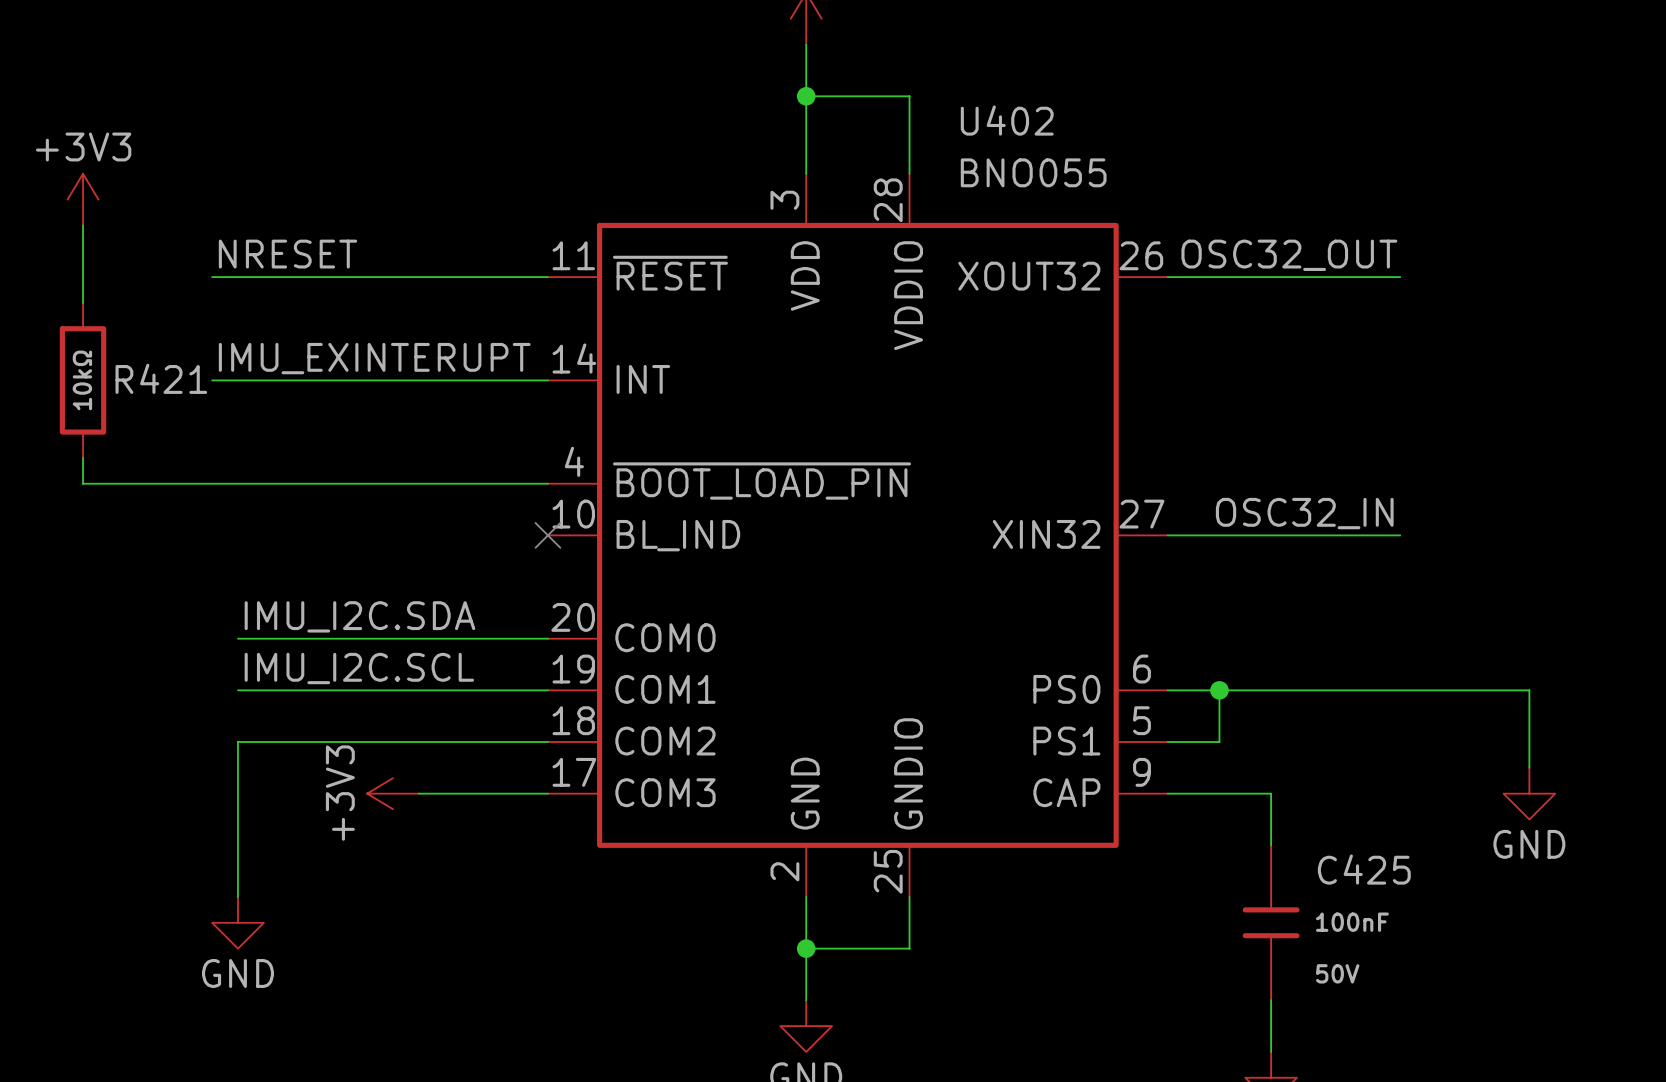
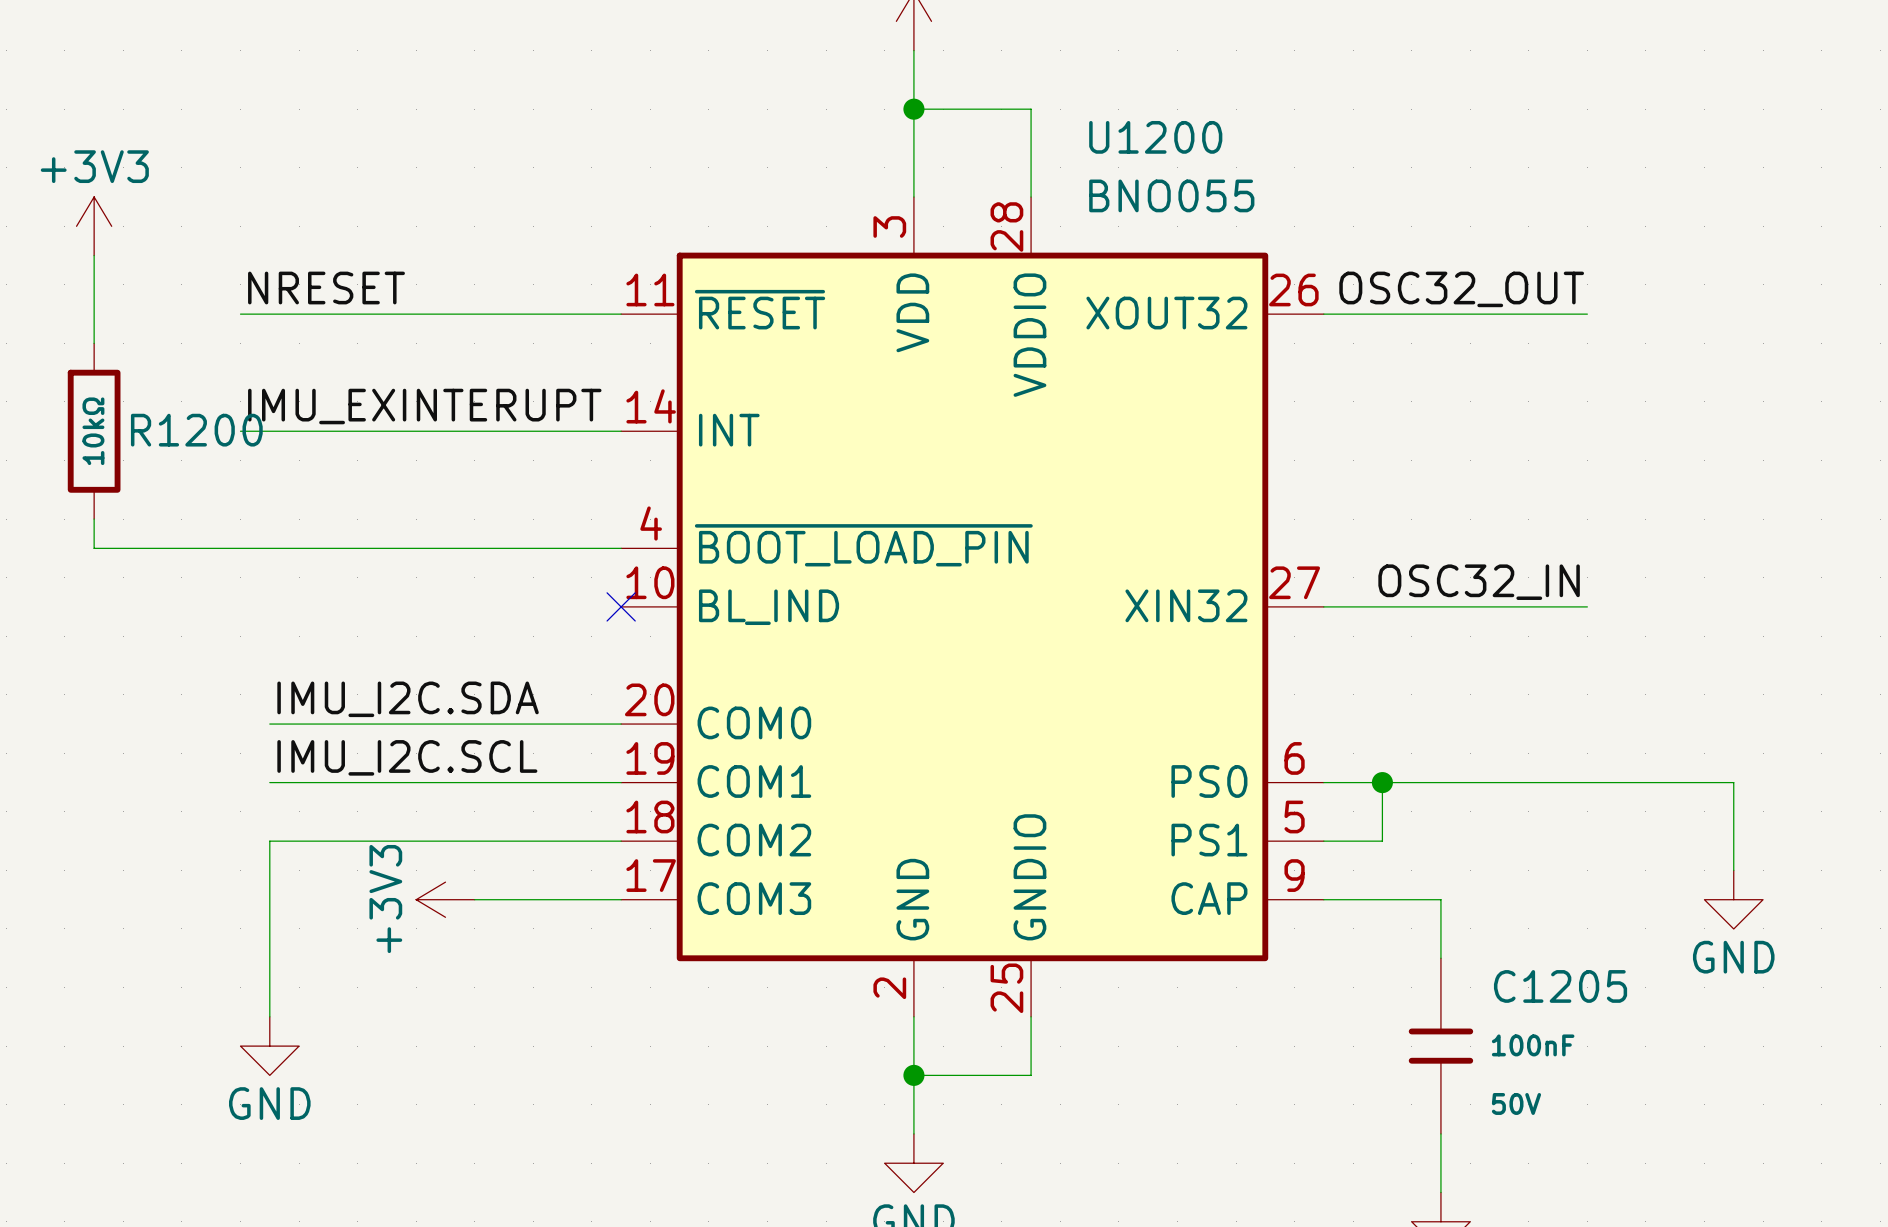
U402 name: U402 (1007, 120) -> U1200 (1155, 137)
R421 name: R421 (161, 378) -> R1200 (196, 430)
C425 name: C425 (1364, 869) -> C1205 (1560, 986)

